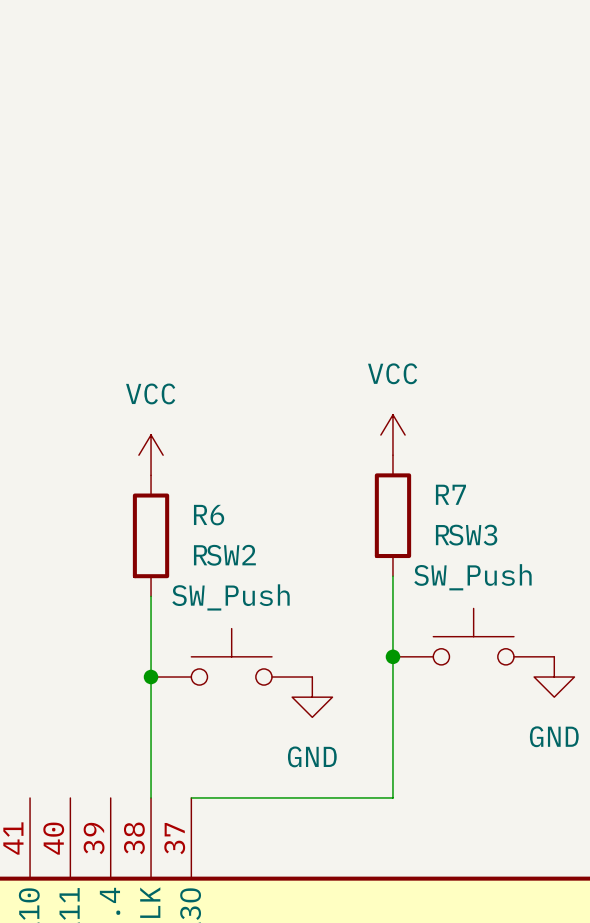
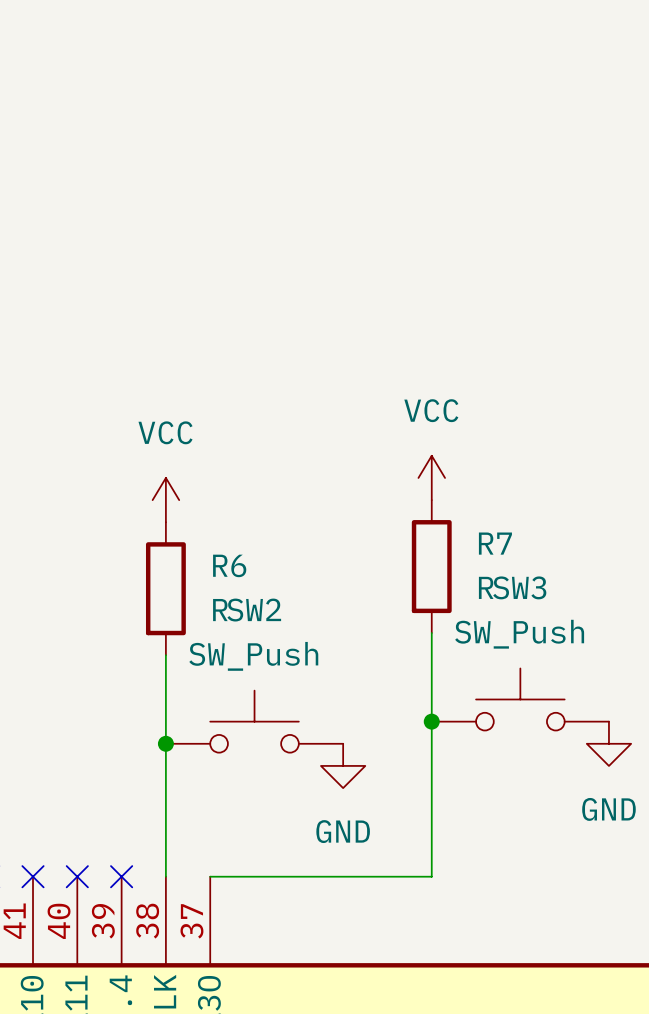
no-connect mark: none -> (33, 876)
no-connect mark: none -> (77, 876)
no-connect mark: none -> (121, 876)

